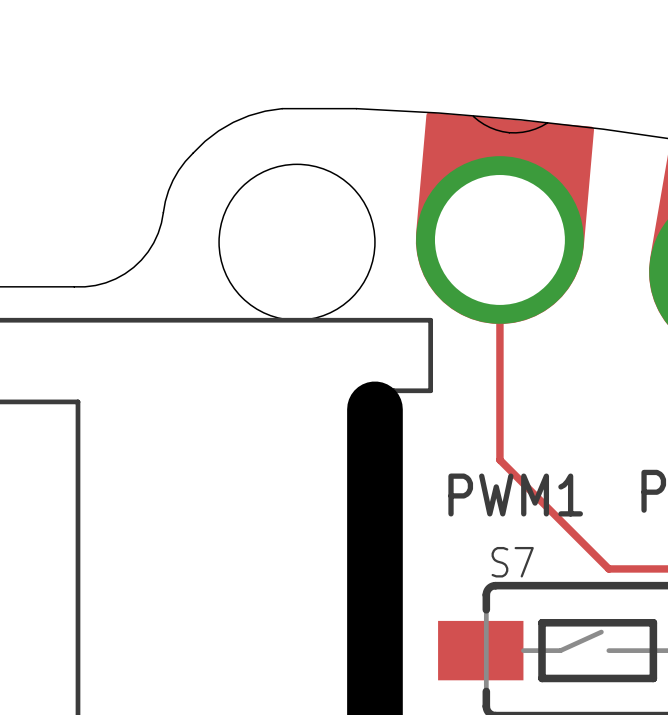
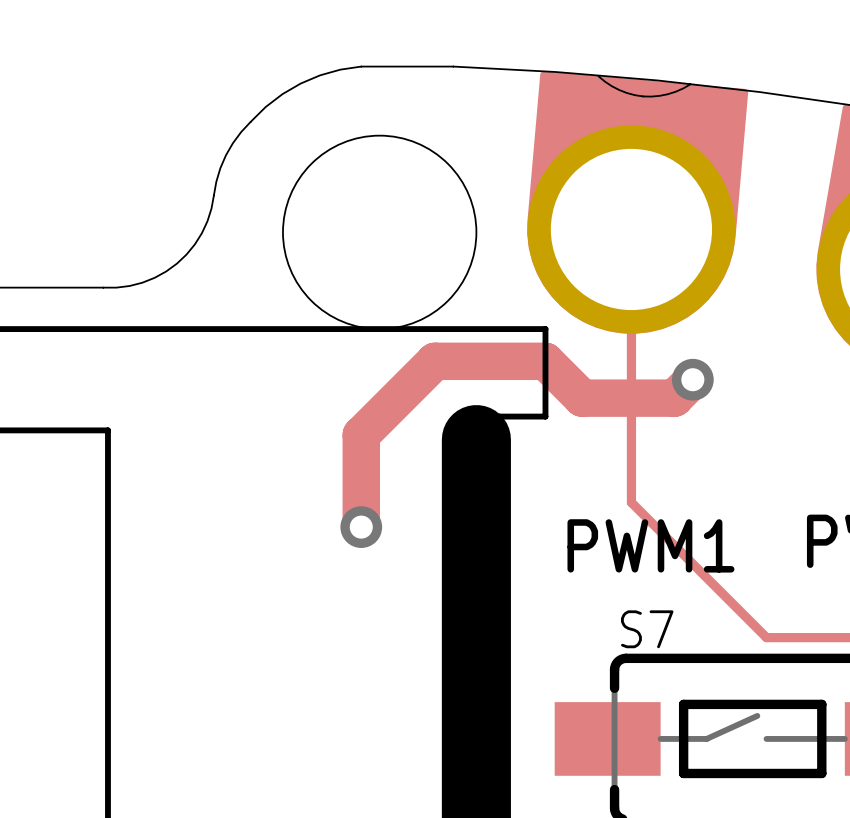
track: none -> (692, 379) (674, 398) (582, 398) (545, 361) (434, 361) (361, 434) (361, 527)
via: none -> (692, 379)
via: none -> (361, 527)

